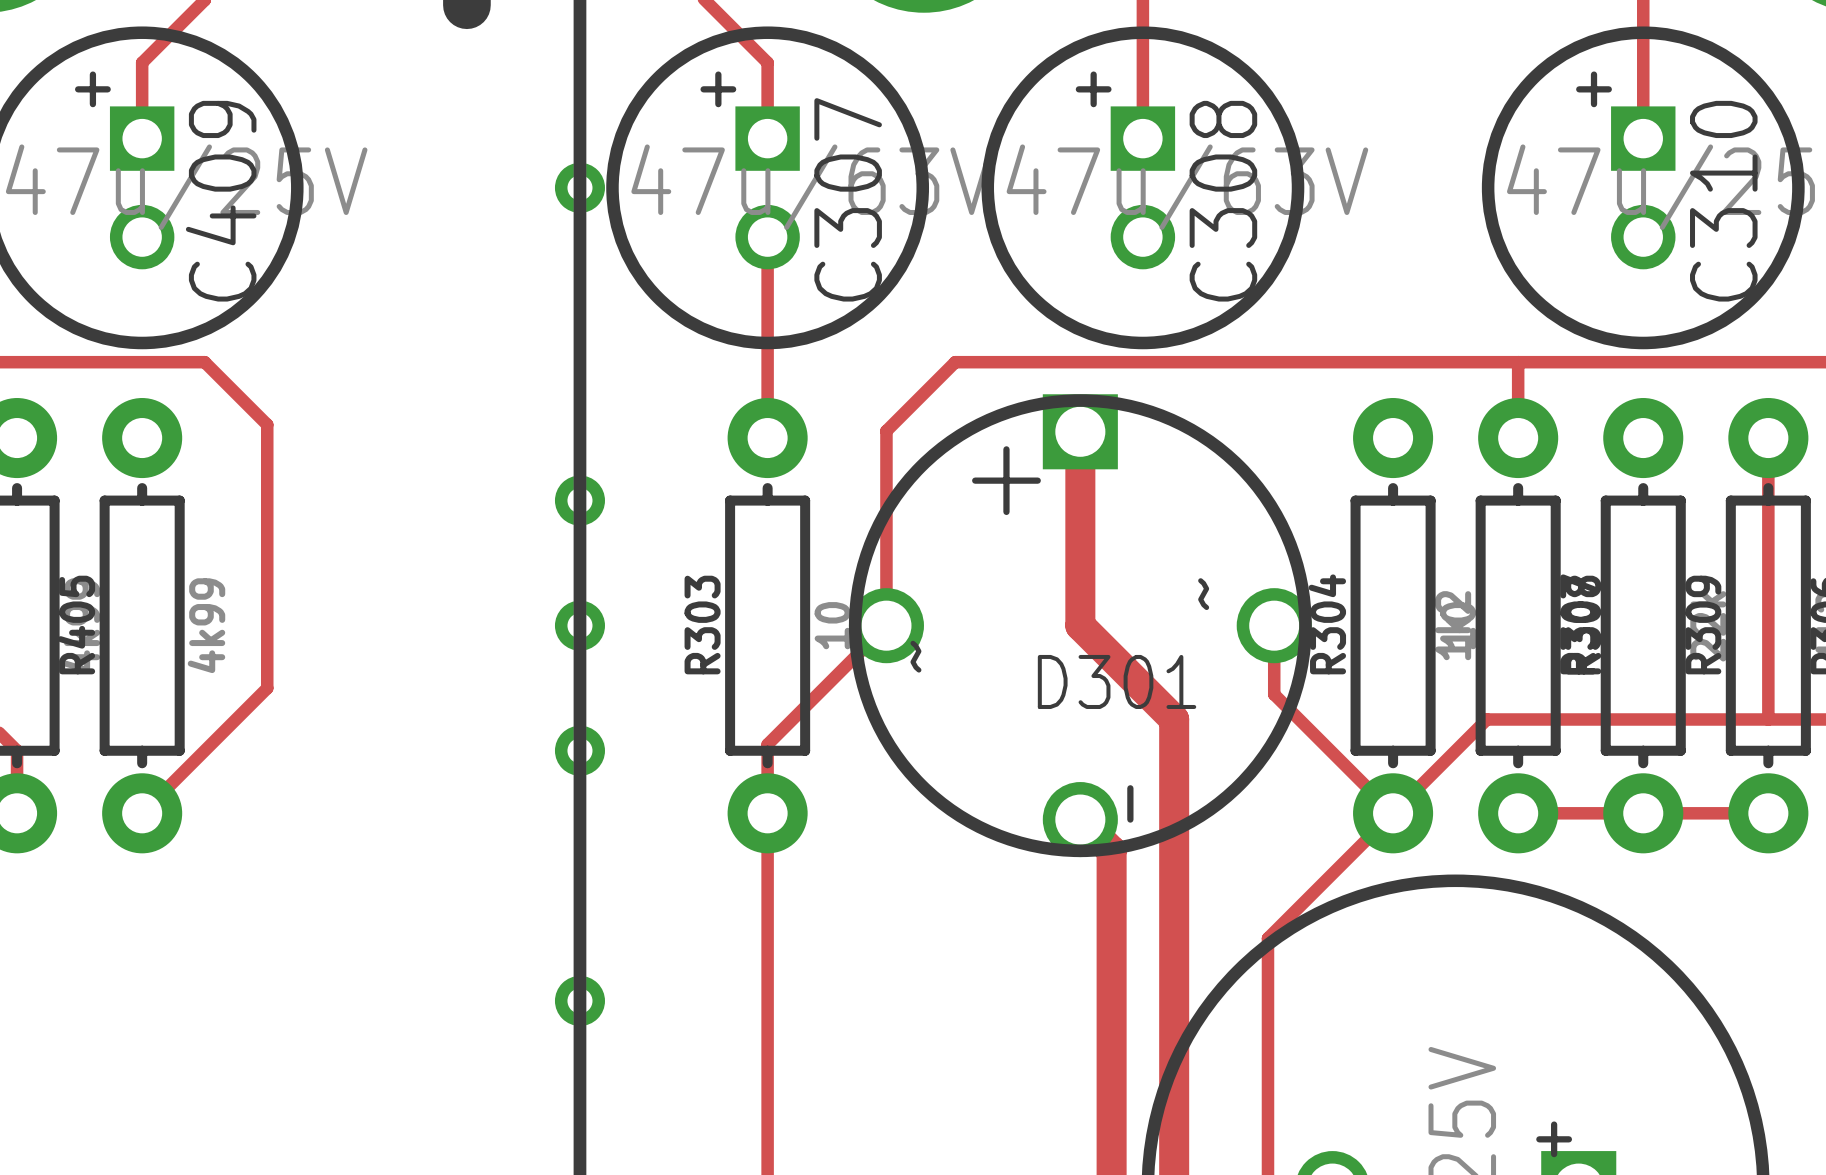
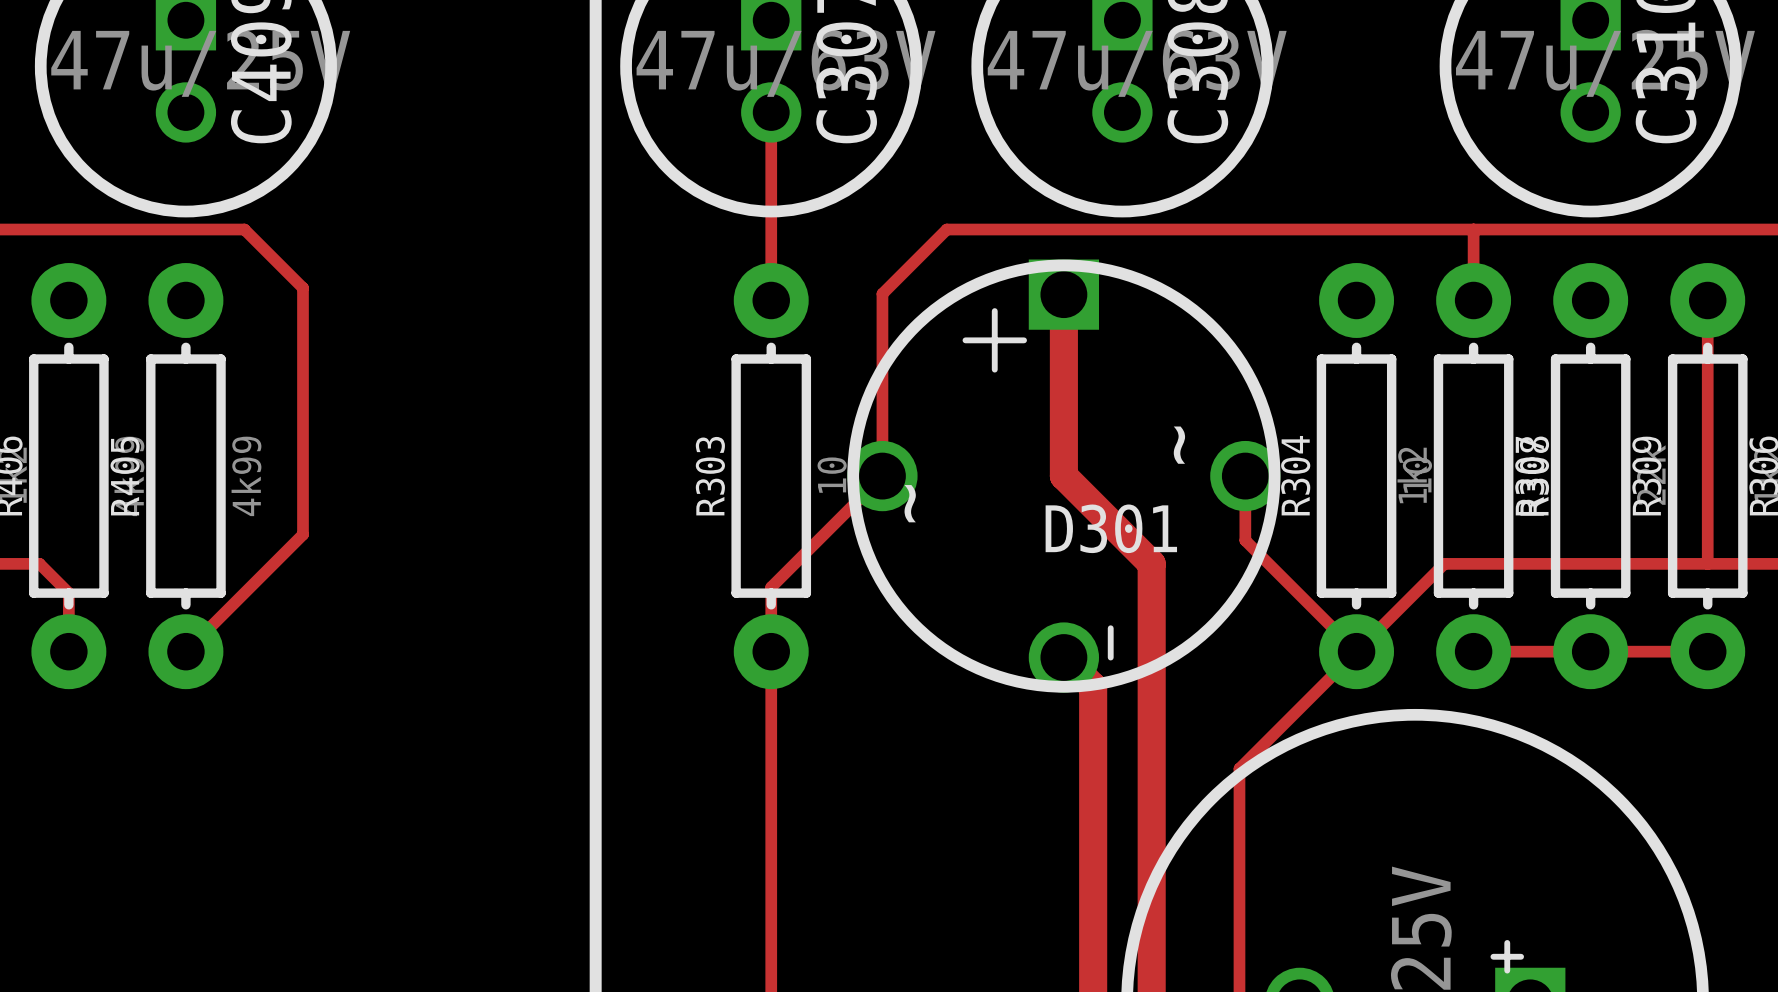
via: (579, 187) -> none
via: (579, 500) -> none
via: (579, 625) -> none
via: (579, 750) -> none
via: (579, 1000) -> none

